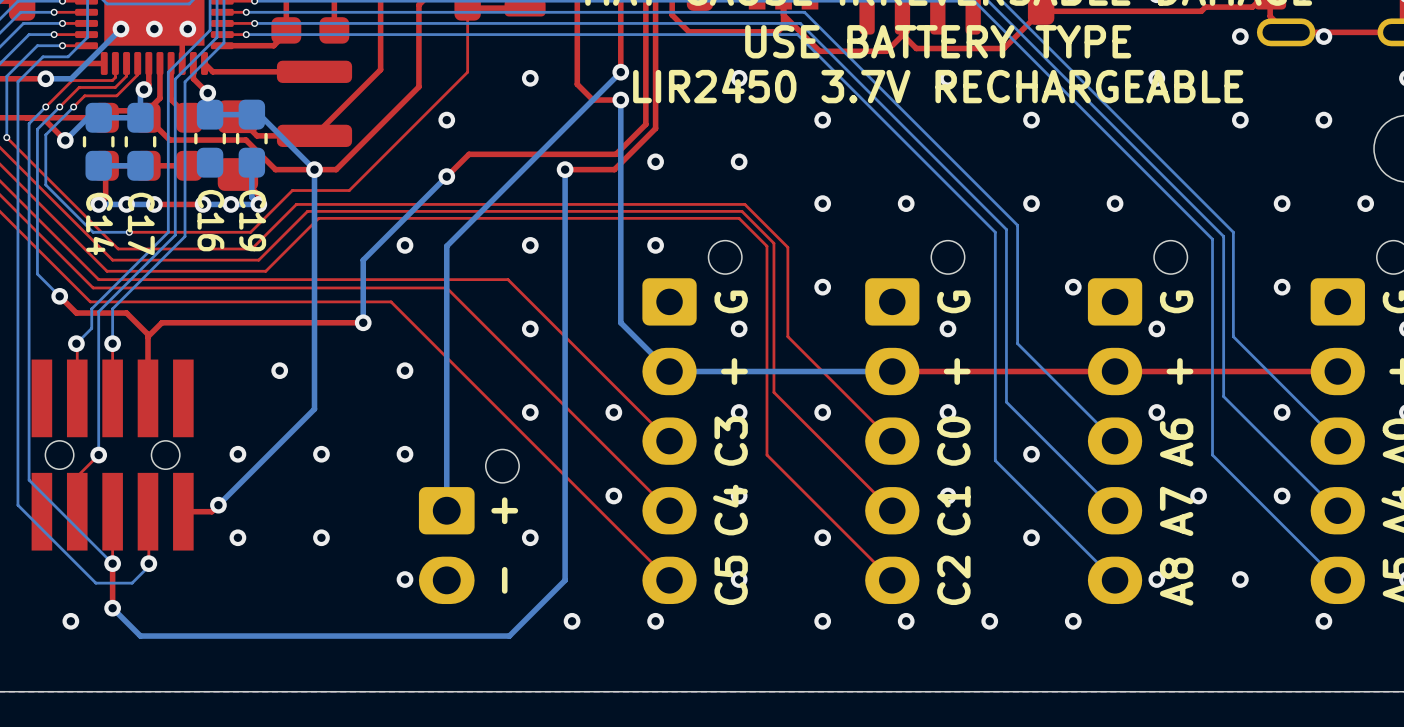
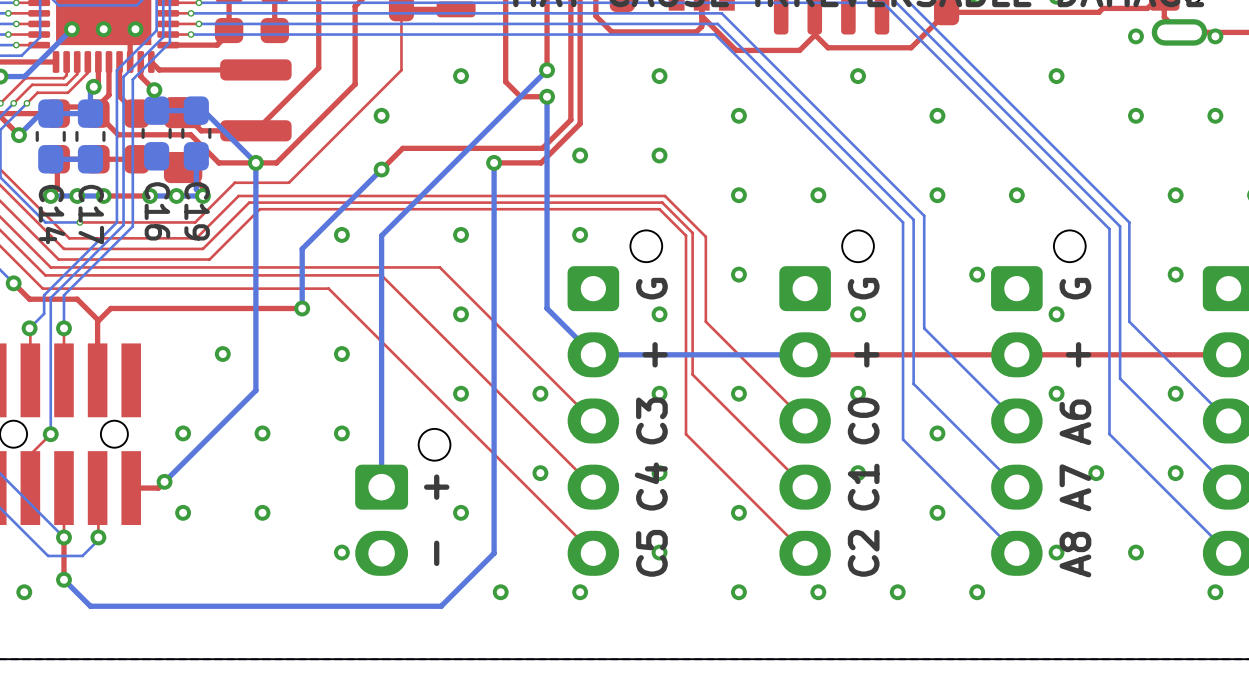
text: USE BATTERY TYPE (938, 41) -> none
text: LIR2450 3.7V RECHARGEABLE (938, 85) -> none

